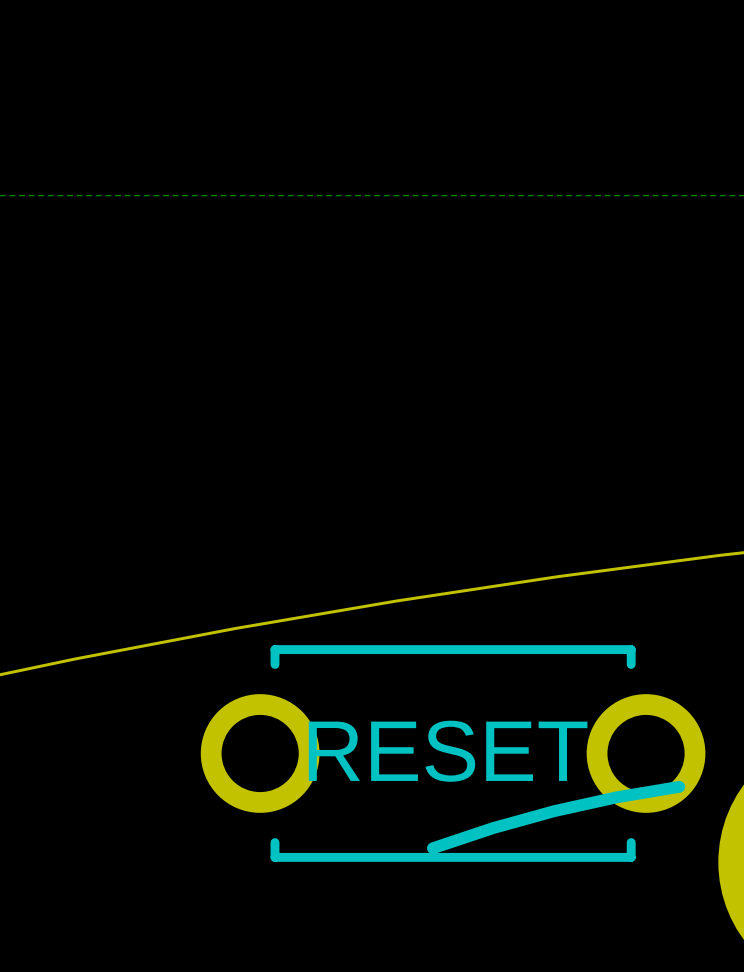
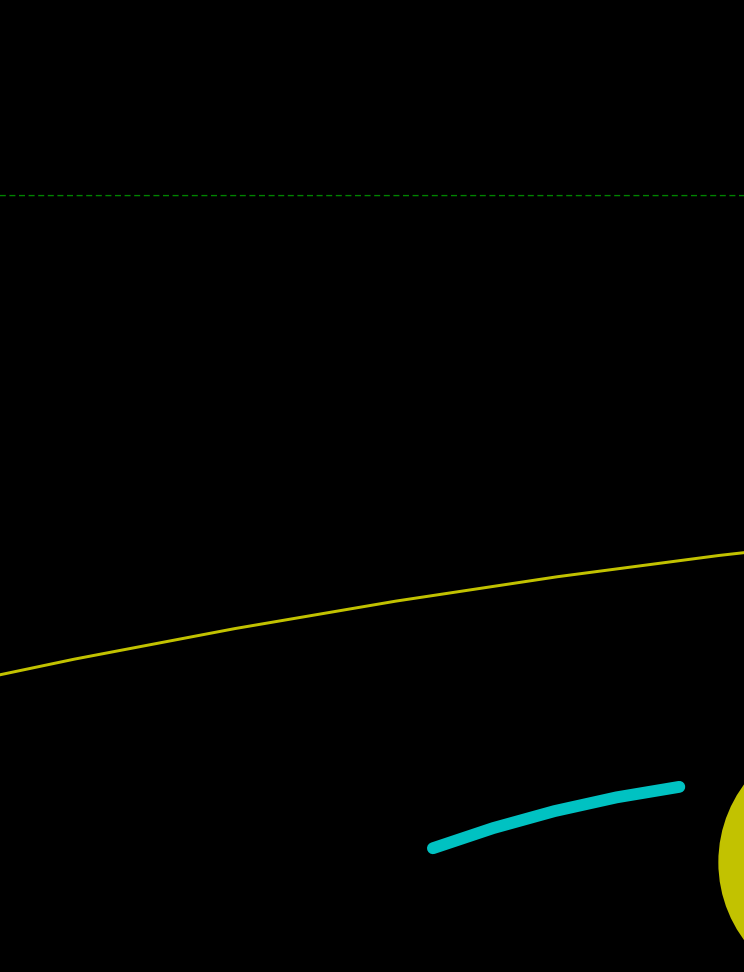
part: (453, 753) -> none

